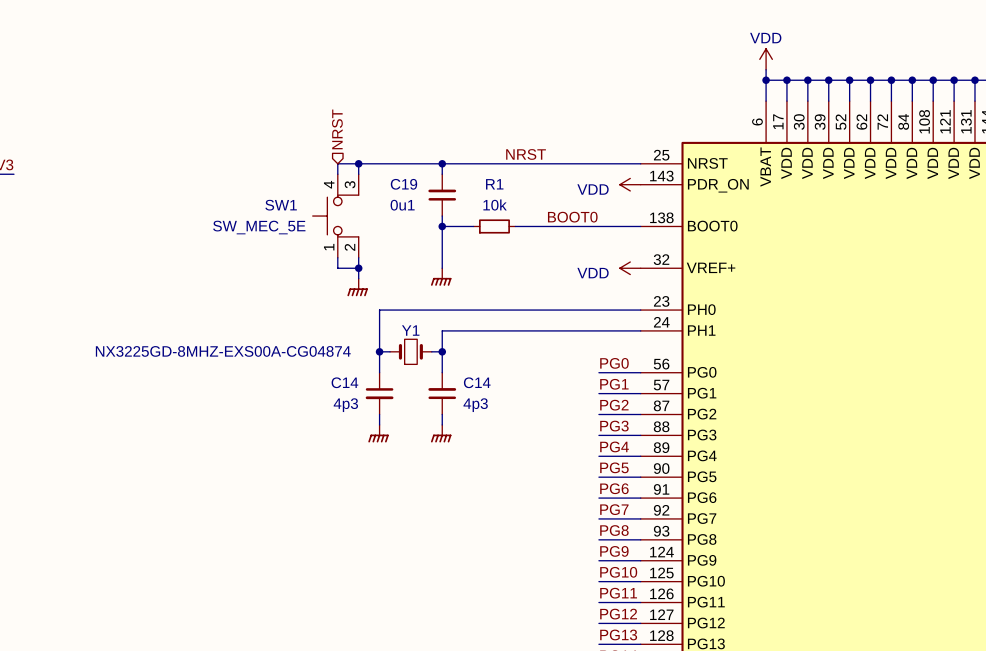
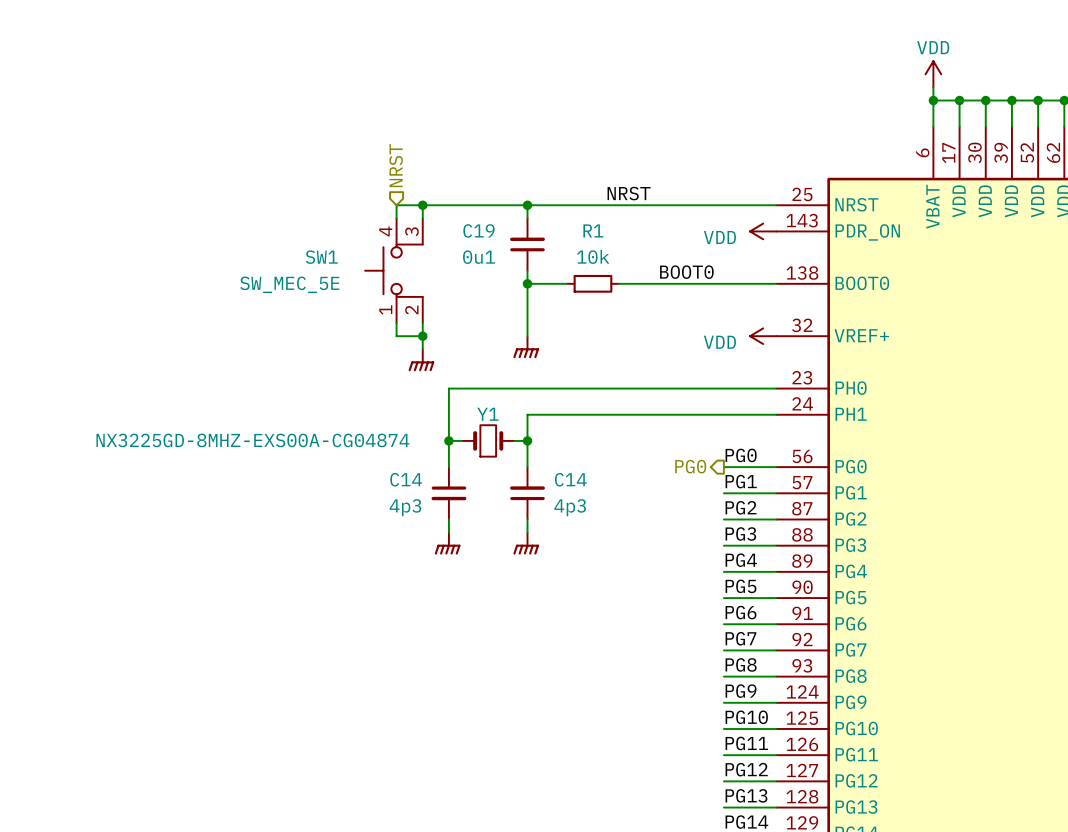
hierarchical label: none -> PG0 (690, 466)

